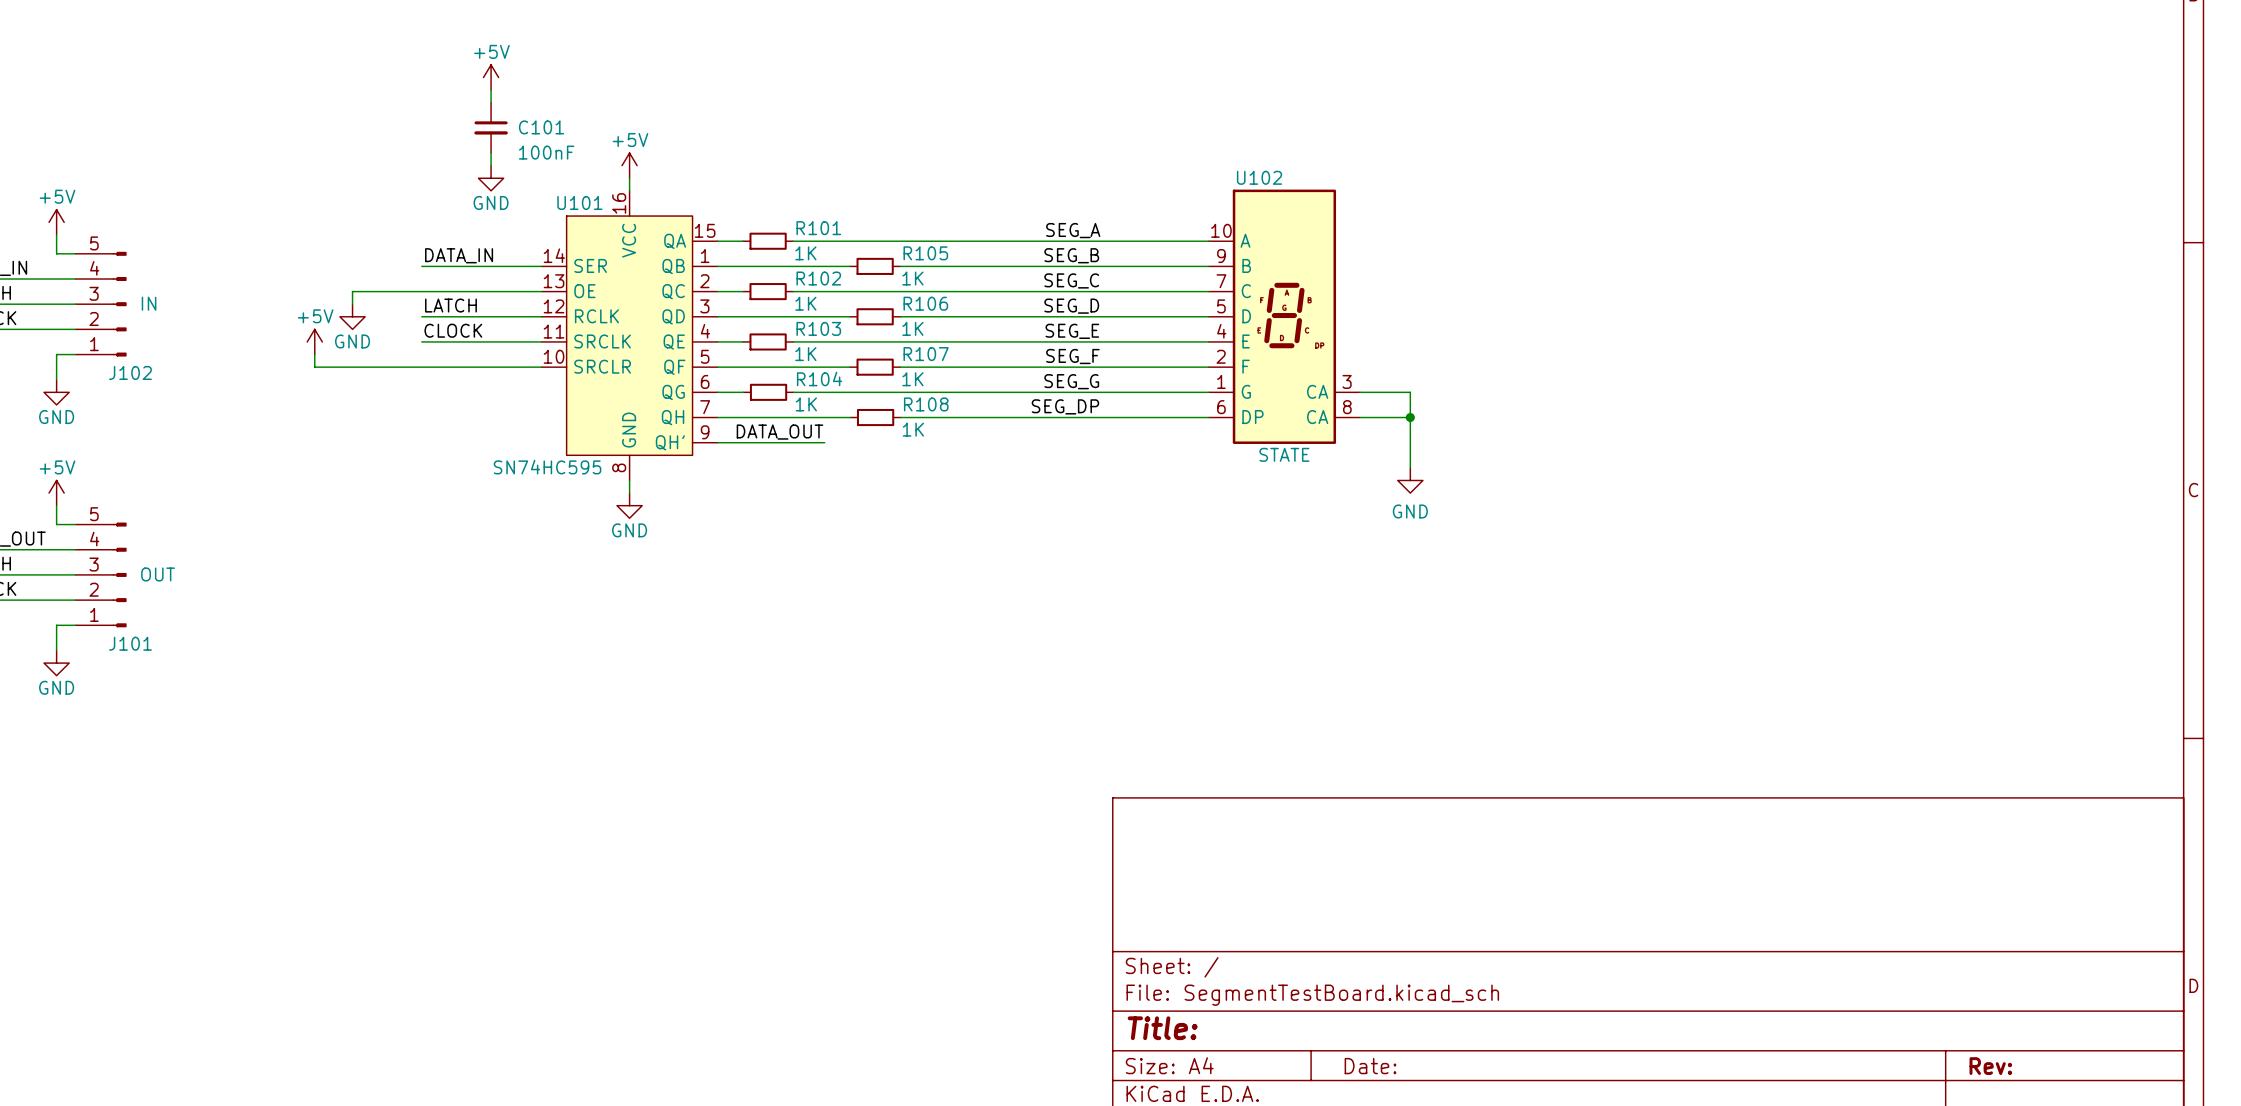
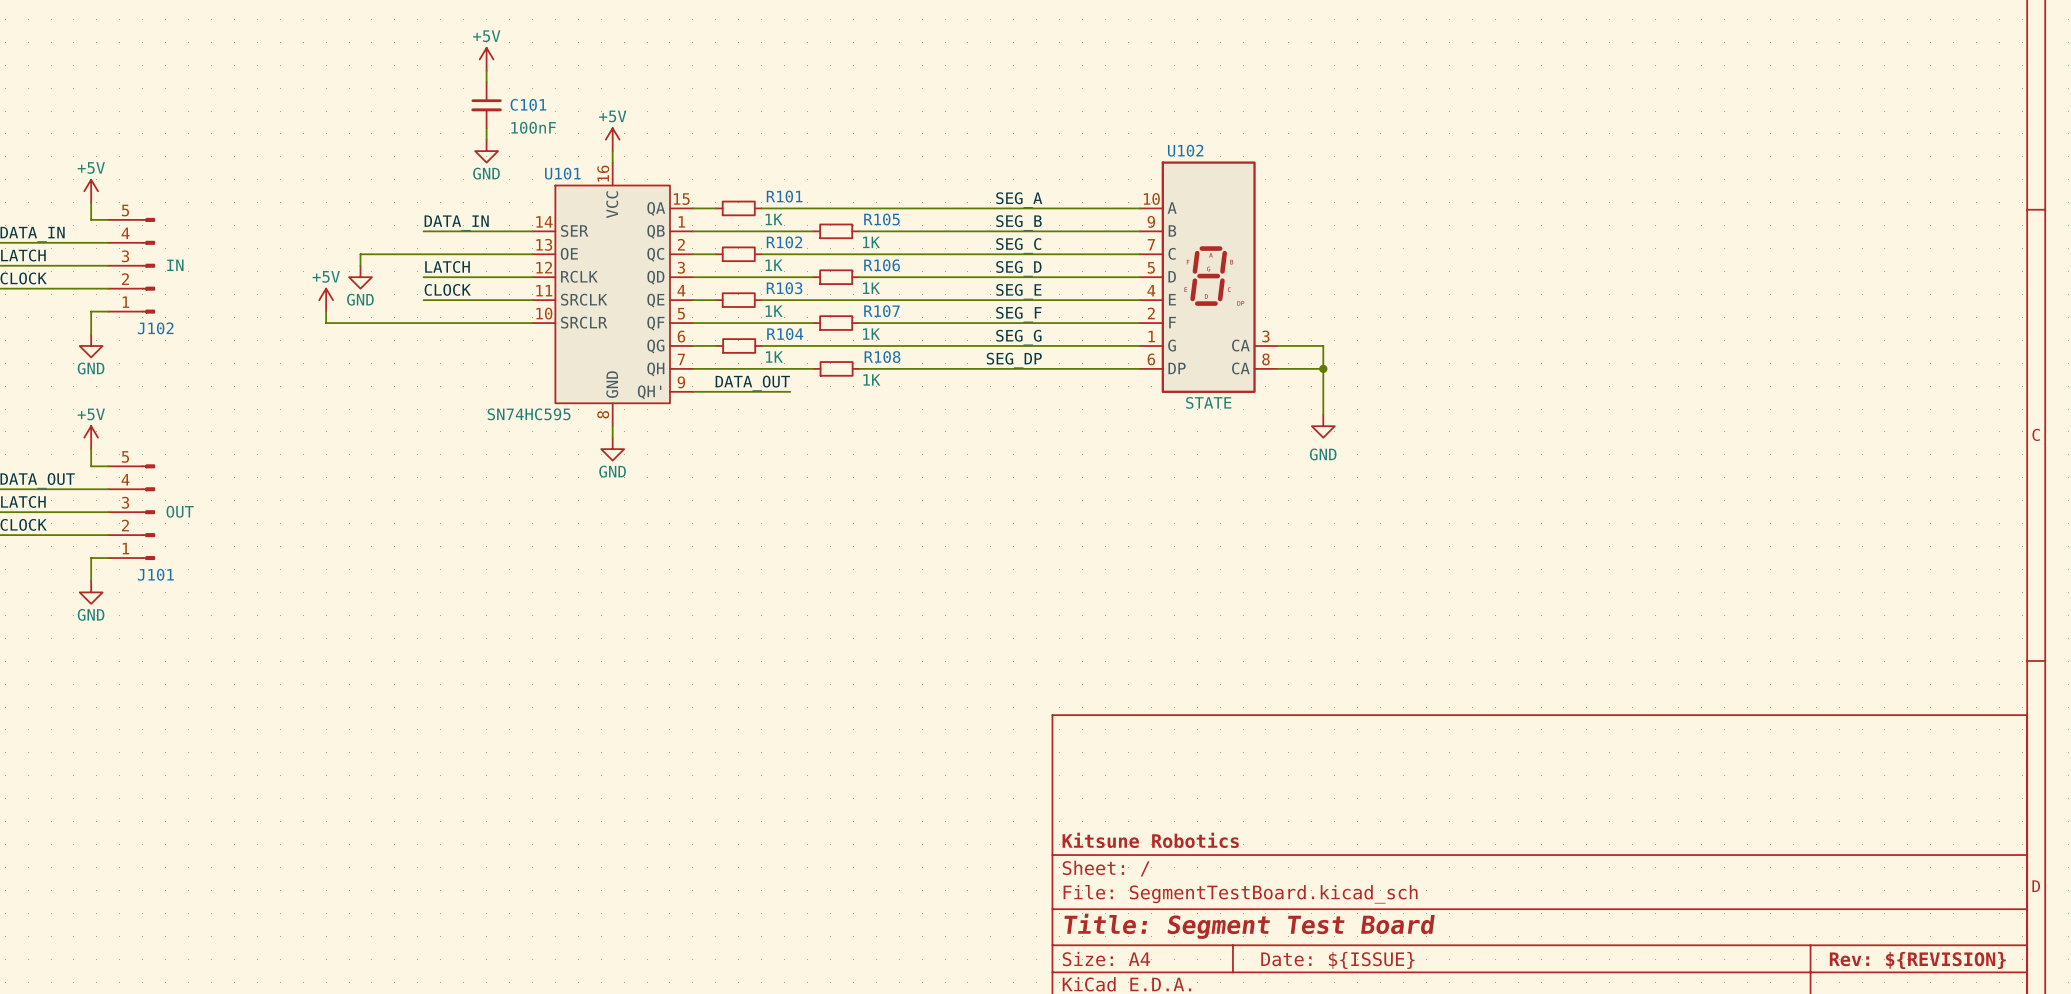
title block: none -> Kitsune Robotics (1150, 840)
title block: Title: (1162, 1028) -> Title: Segment Test Board (1249, 926)
title block: Date: (1370, 1066) -> Date: ${ISSUE} (1337, 960)
title block: Rev: (1990, 1066) -> Rev: ${REVISION} (1917, 960)

